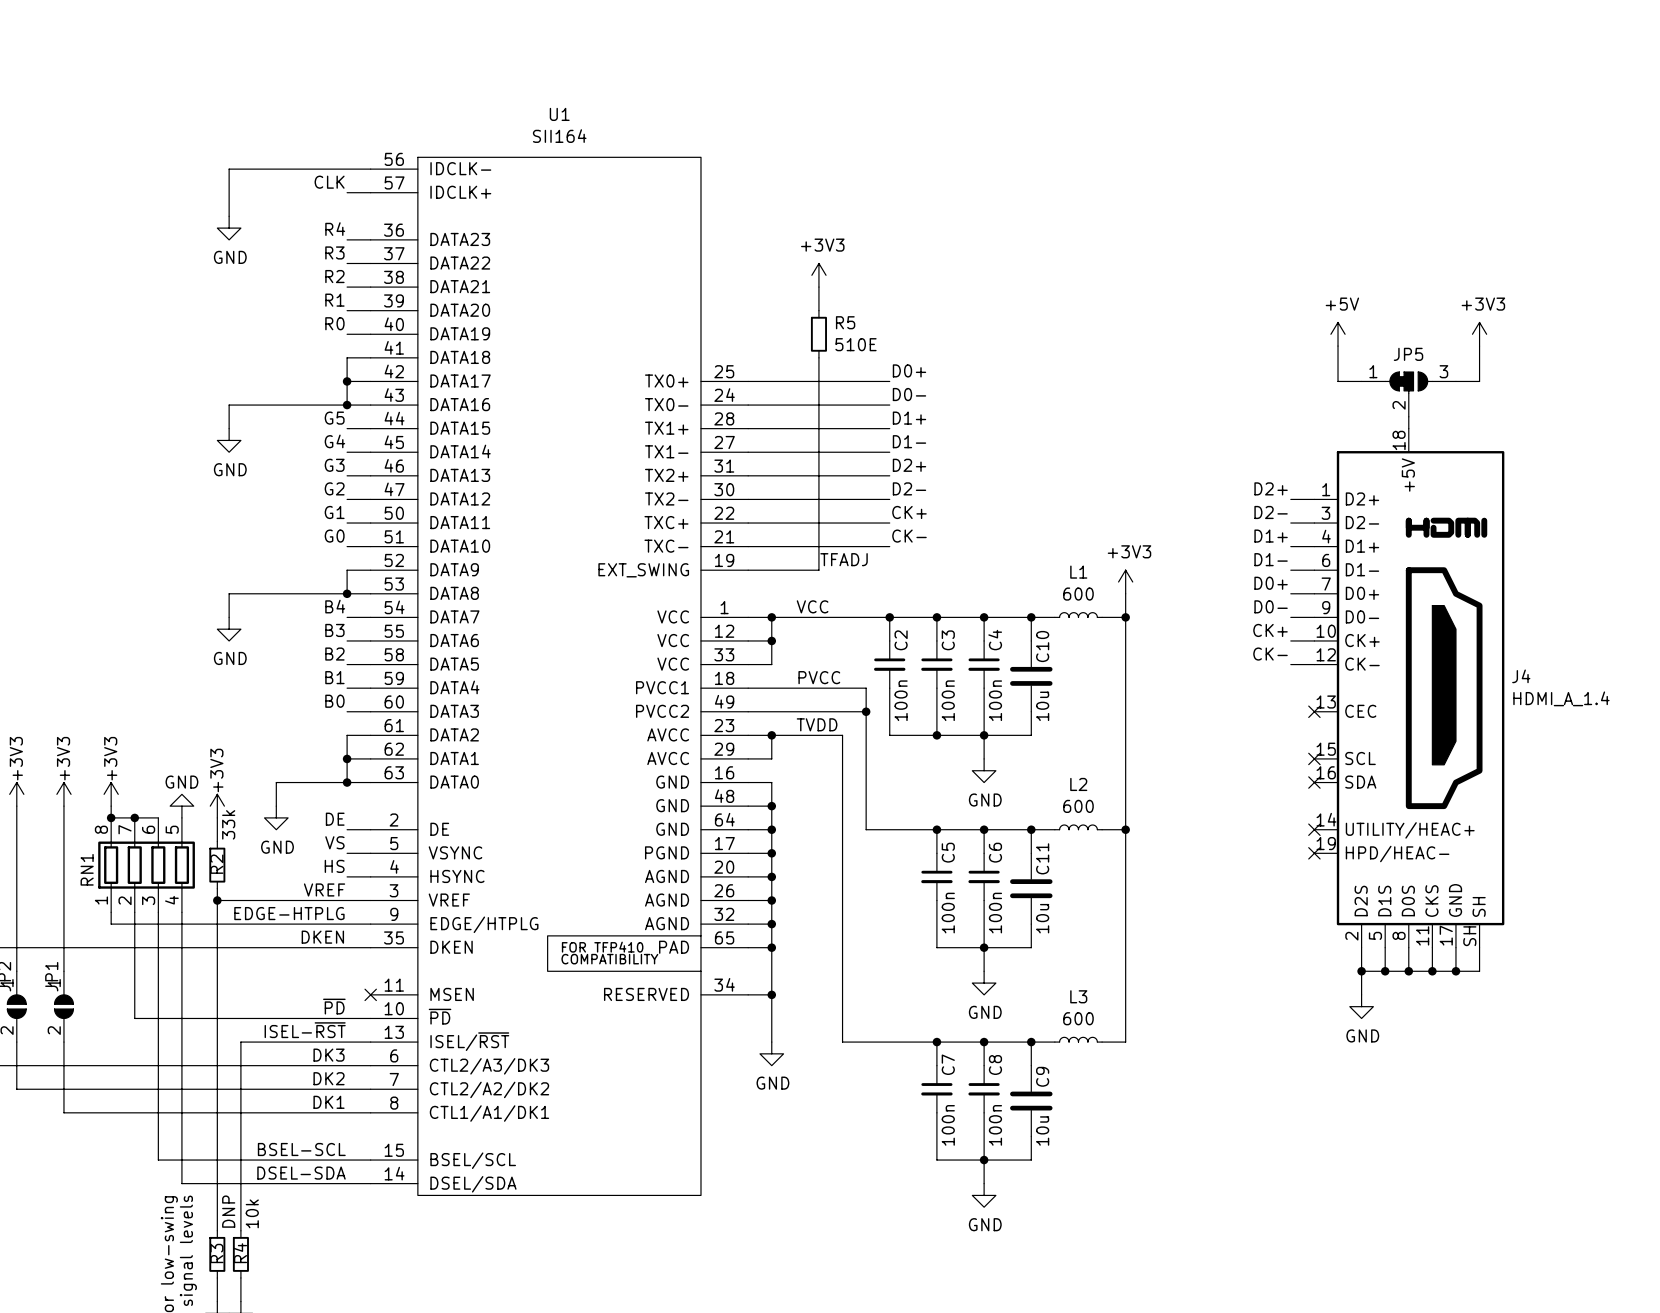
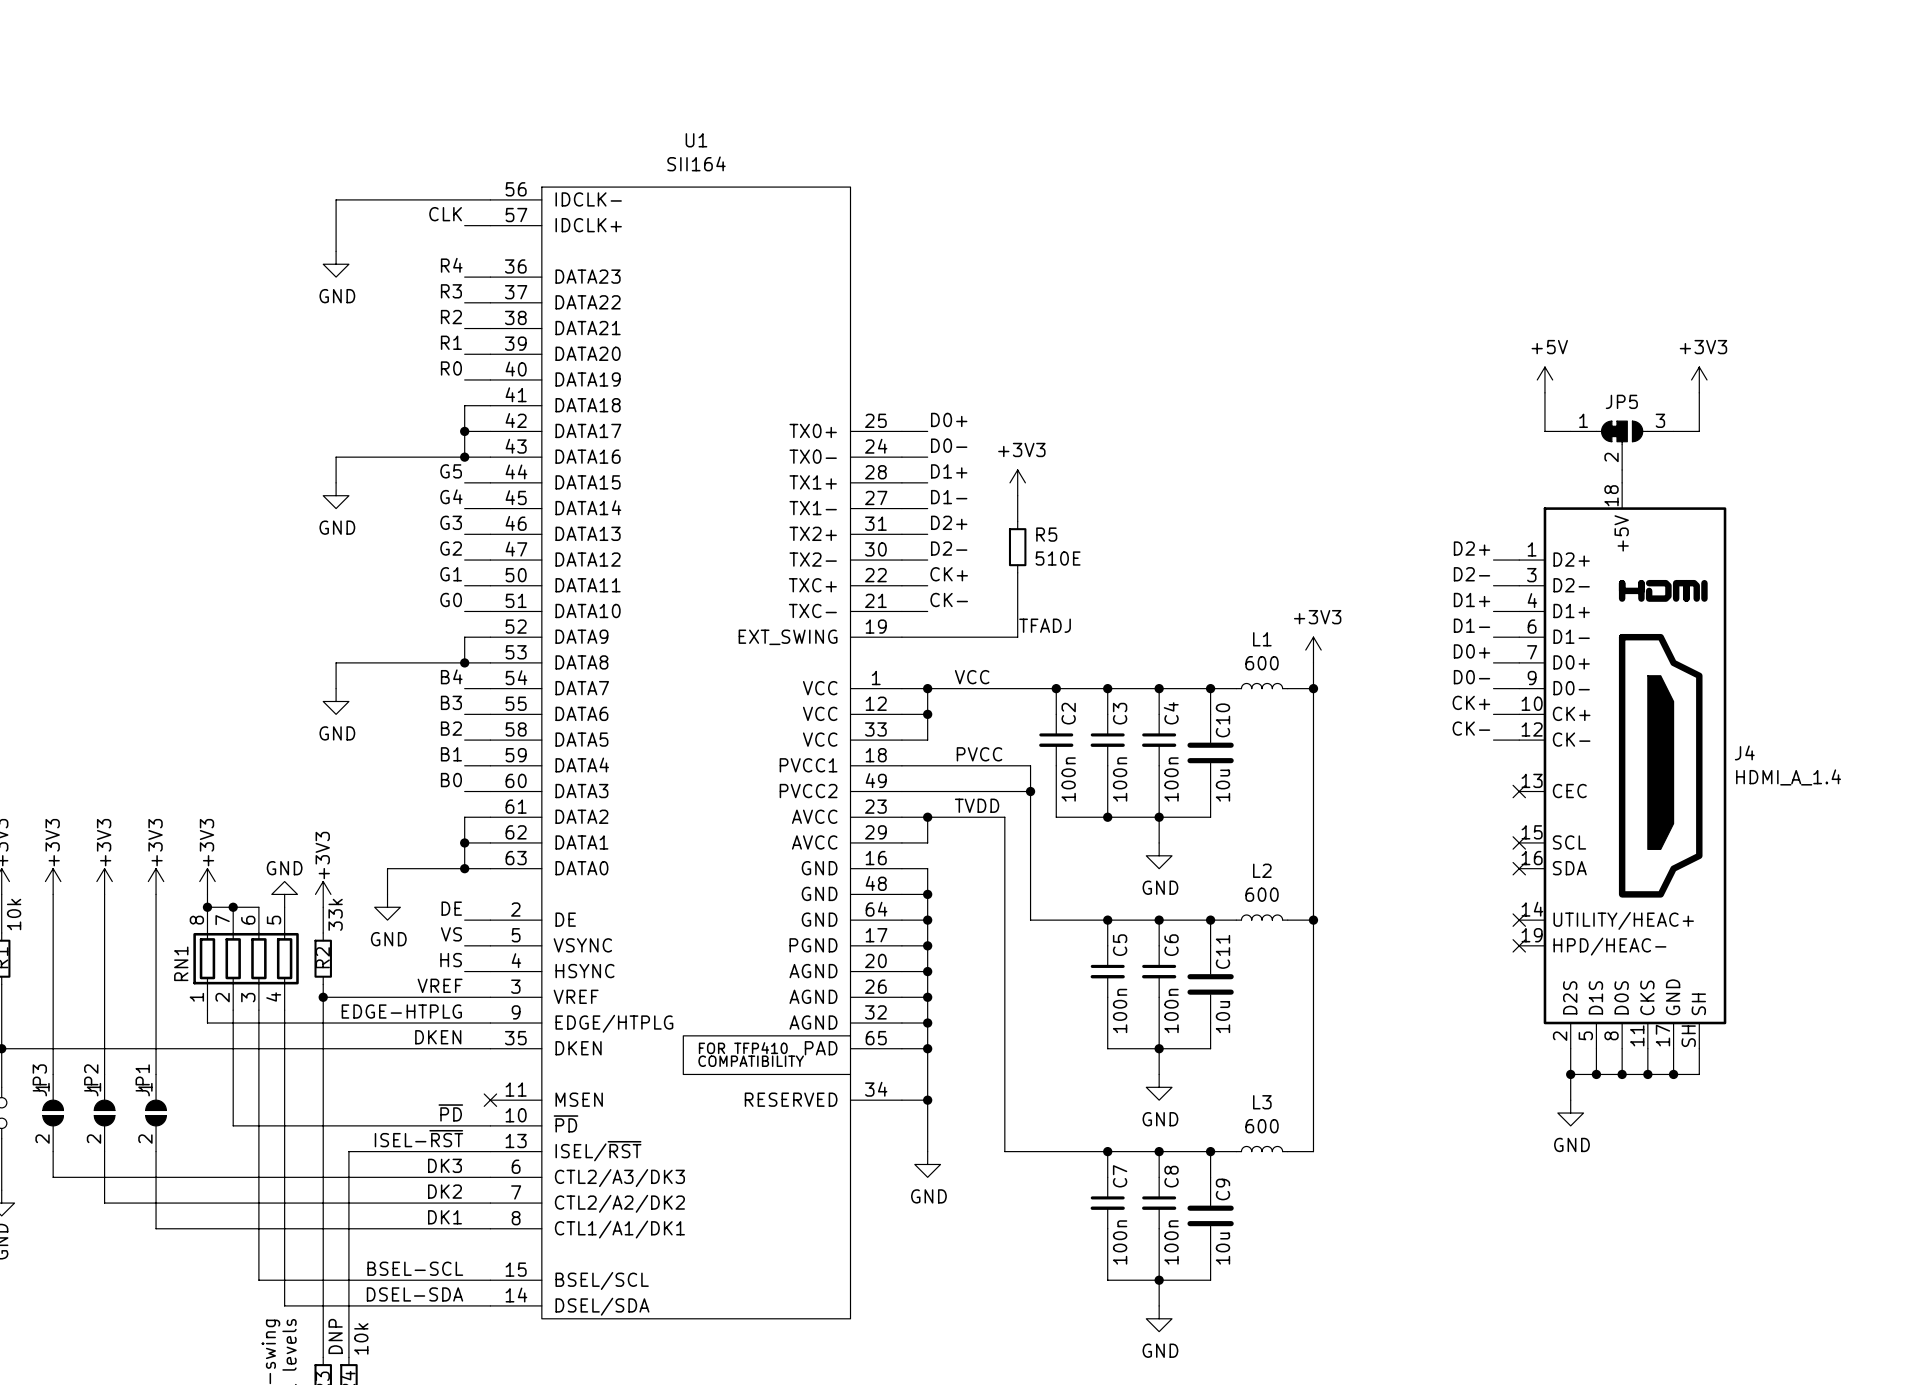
power symbol position: +3V3 (818, 275) -> +3V3 (1017, 482)
wire: (818, 287) (818, 310) -> (1017, 495) (1017, 521)
R5 position: (818, 334) -> (1017, 547)
wire: (818, 357) (818, 570) -> (1017, 572) (1017, 637) (979, 637)
label position: D0+ (909, 370) -> D0+ (949, 419)
wire: (771, 381) (889, 381) -> none
label position: D0- (909, 394) -> D0- (949, 445)
wire: (771, 405) (889, 405) -> none
label position: D1+ (909, 418) -> D1+ (949, 471)
wire: (771, 428) (889, 428) -> none
label position: D1- (909, 441) -> D1- (949, 497)
wire: (771, 452) (889, 452) -> none
label position: D2+ (909, 465) -> D2+ (949, 522)
wire: (771, 475) (889, 475) -> none
label position: D2- (909, 488) -> D2- (949, 548)
wire: (771, 499) (889, 499) -> none
label position: CK+ (909, 512) -> CK+ (949, 574)
wire: (771, 523) (889, 523) -> none
label position: CK- (909, 536) -> CK- (949, 599)
wire: (771, 546) (889, 546) -> none
label position: TFADJ (844, 559) -> TFADJ (1045, 625)

